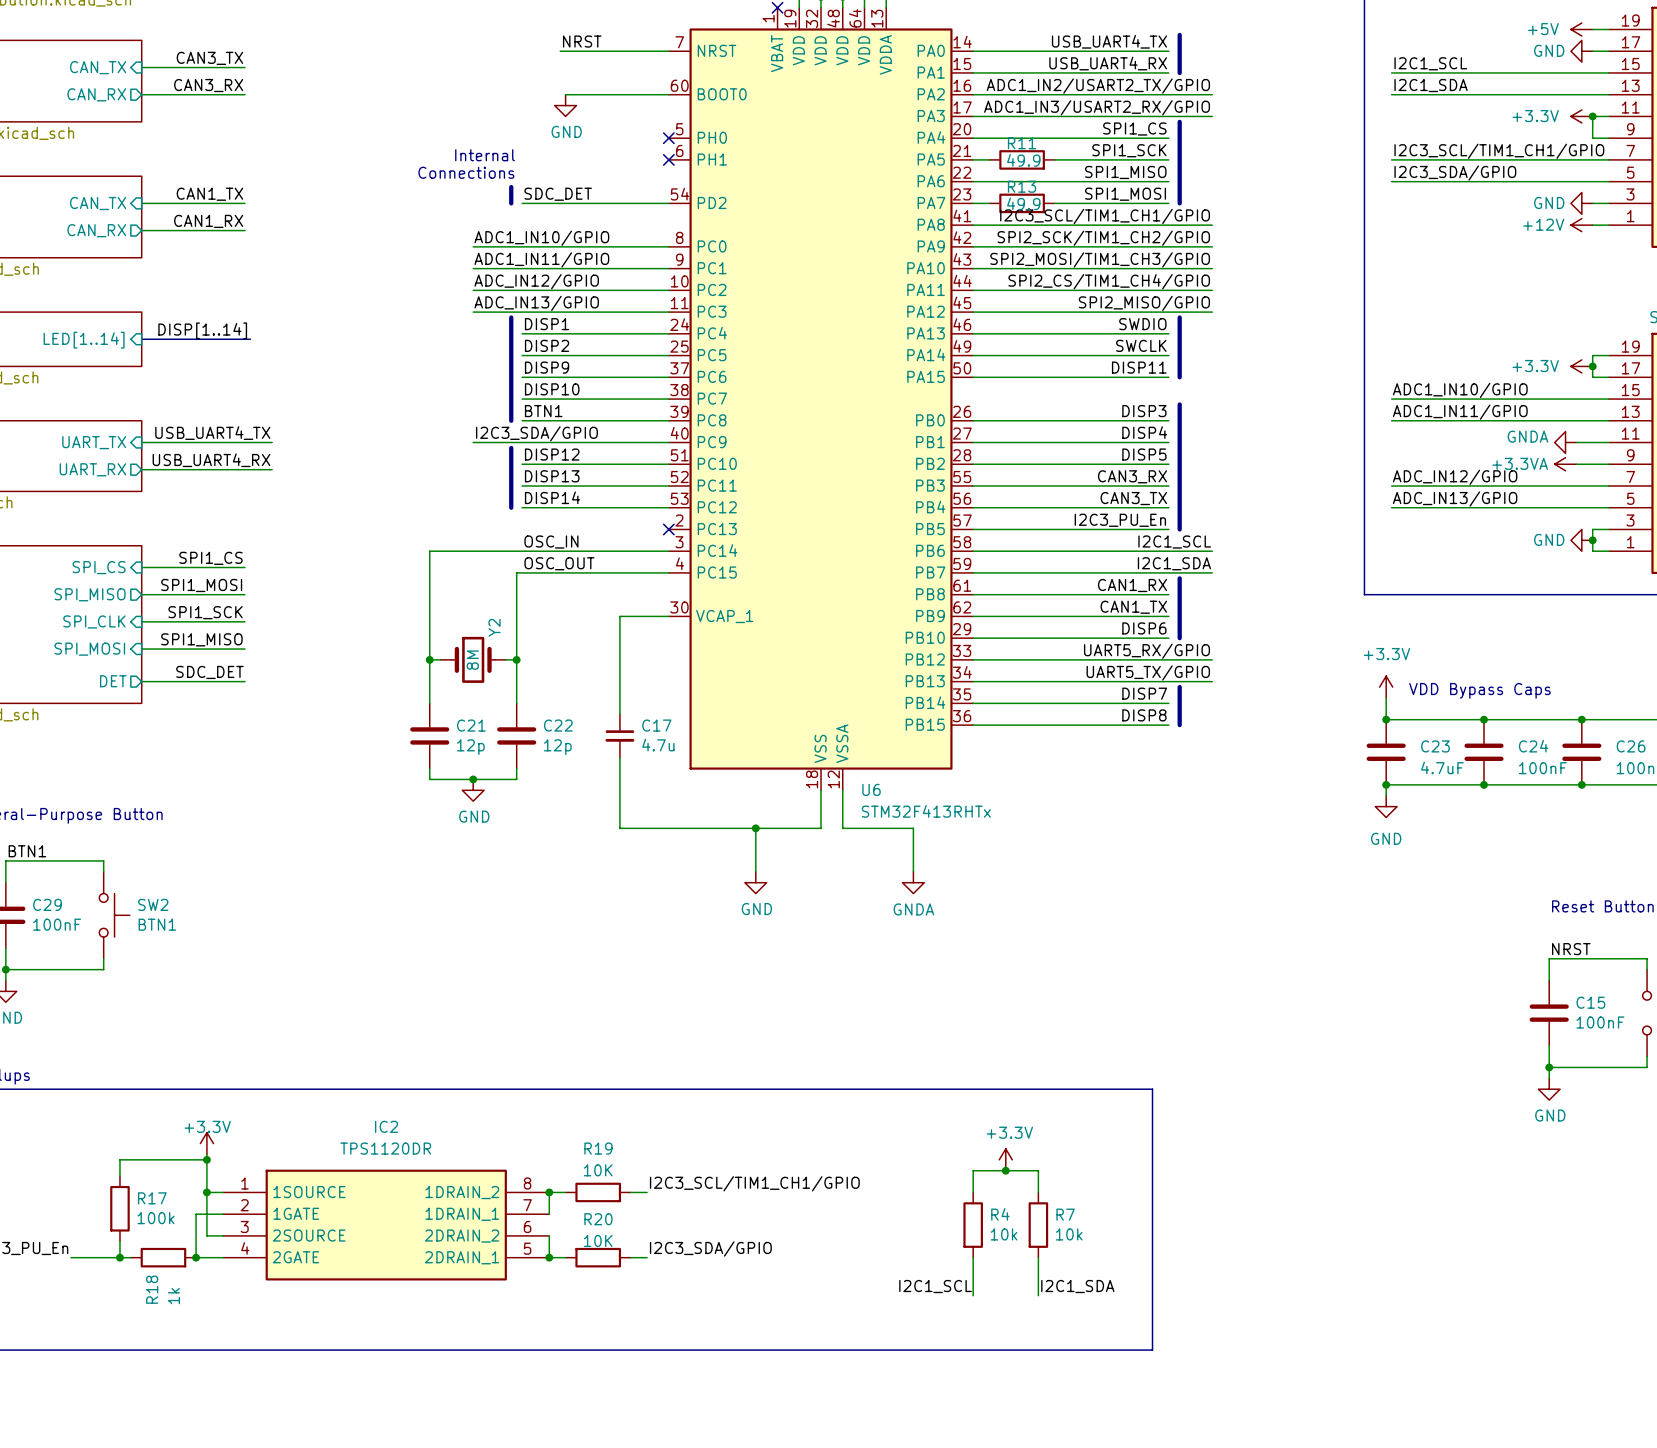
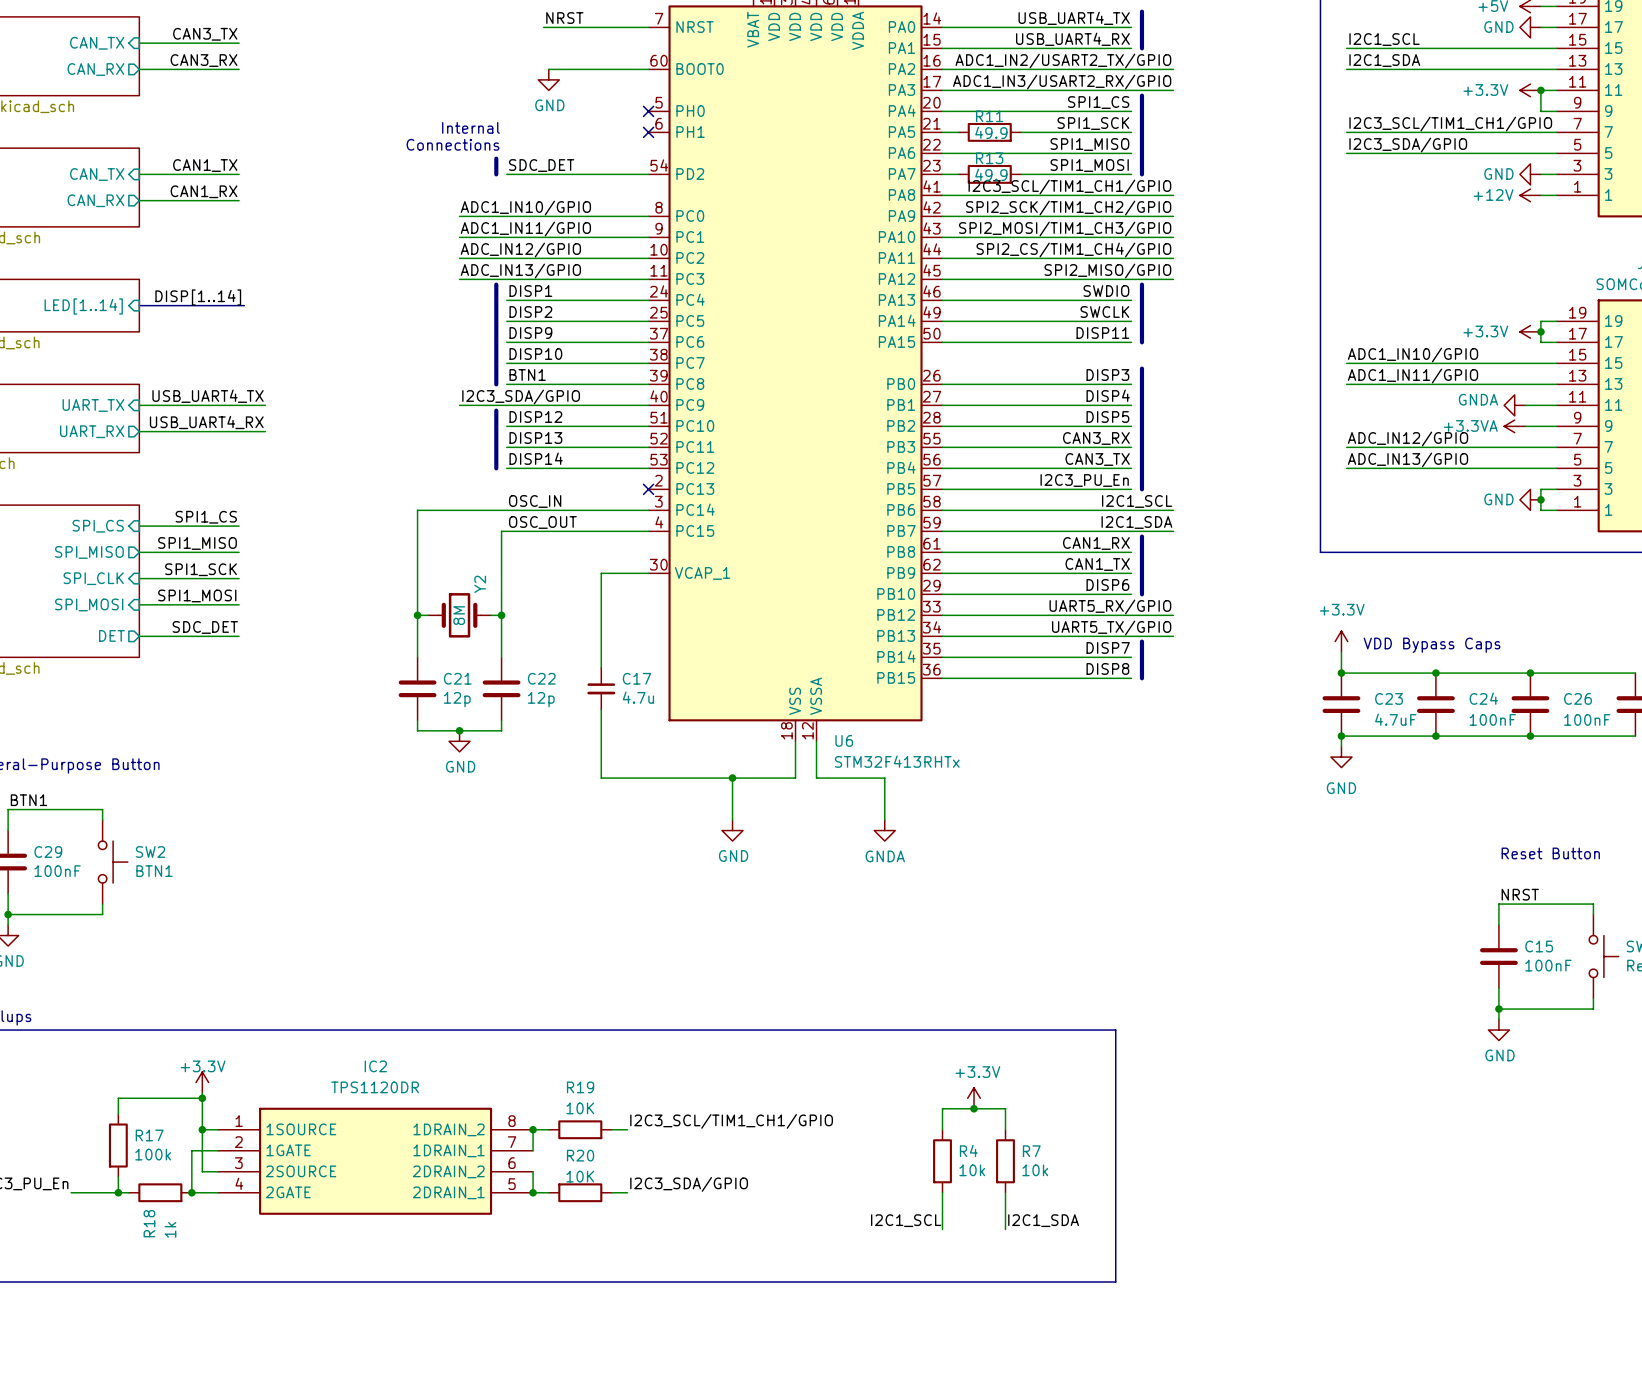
label: SPI1_MOSI (201, 585) -> SPI1_MISO (197, 543)
label: SPI1_MISO (201, 639) -> SPI1_MOSI (197, 595)

